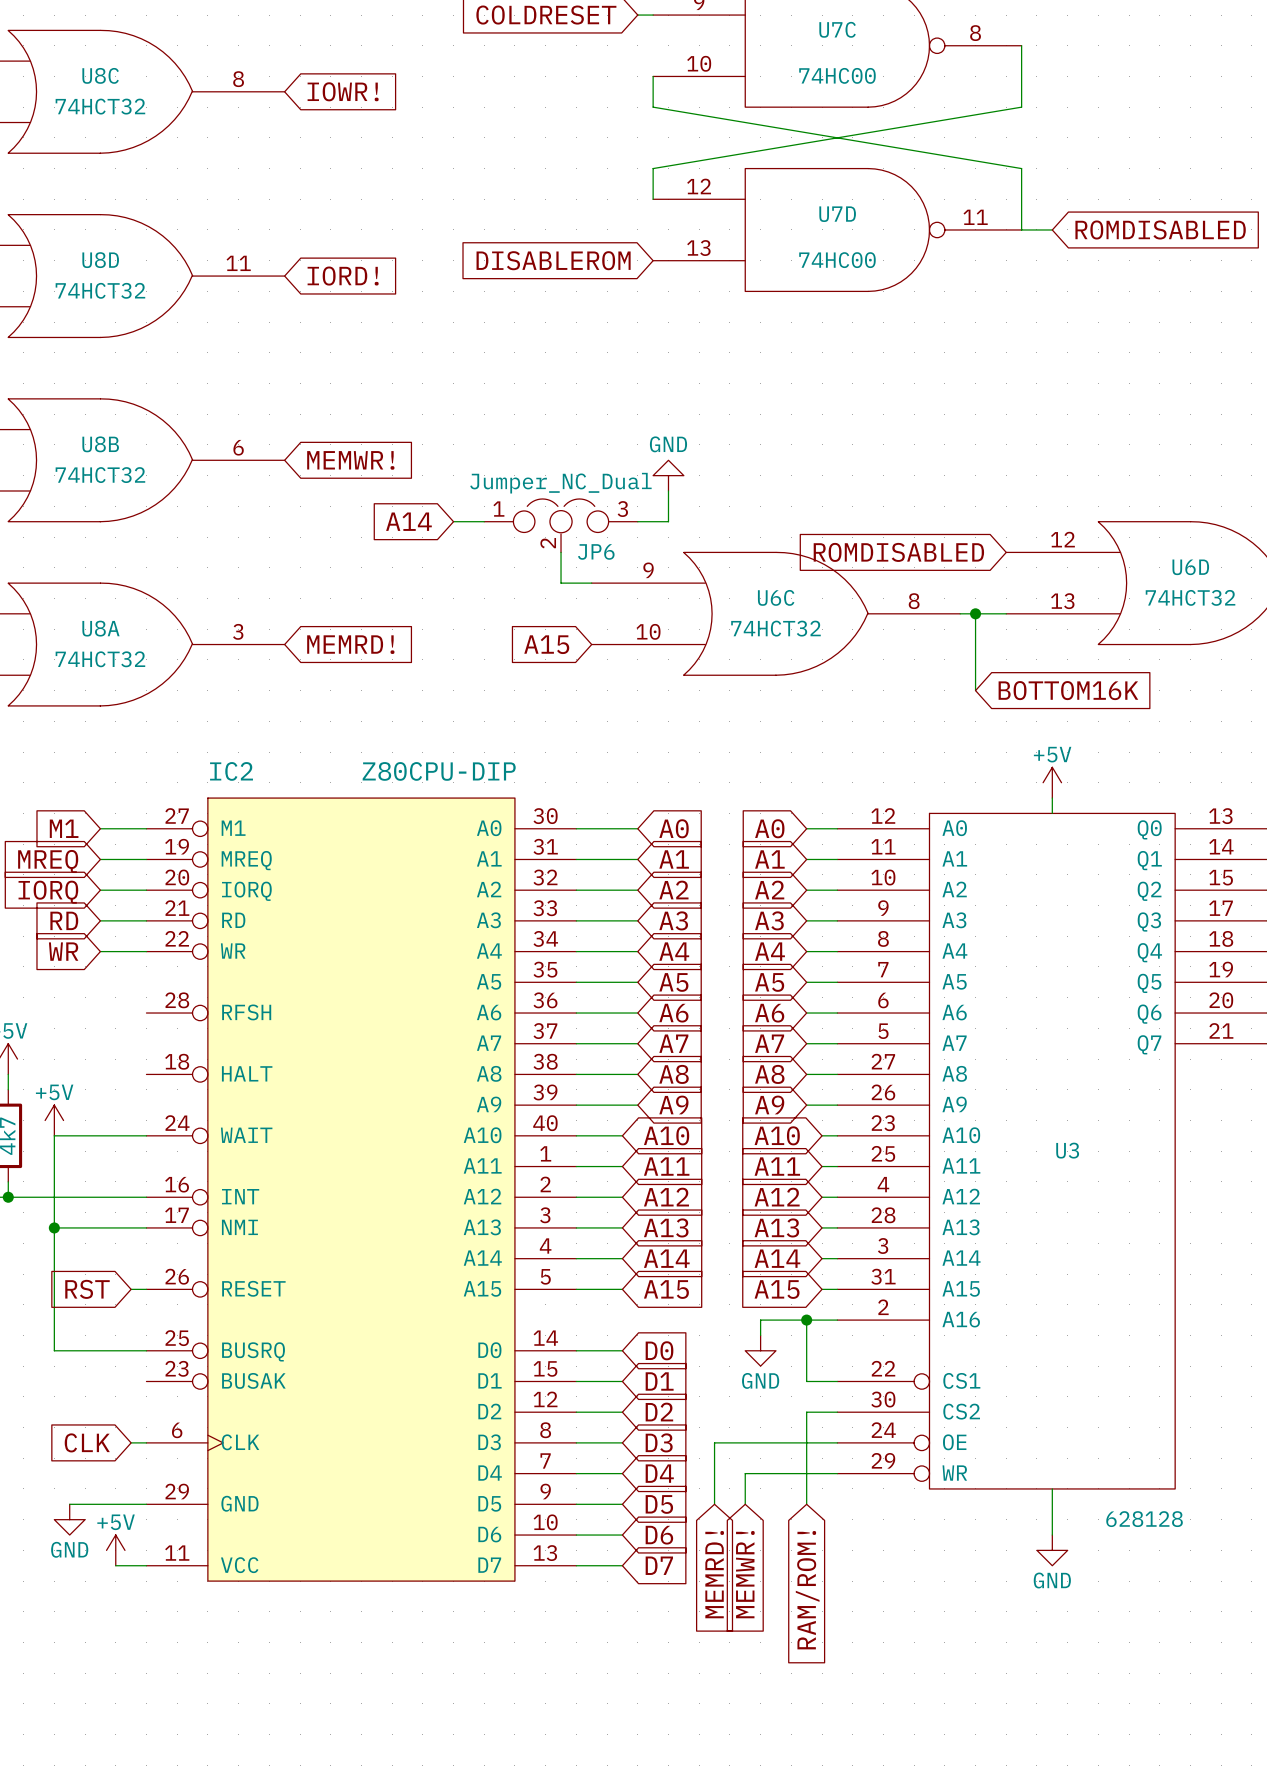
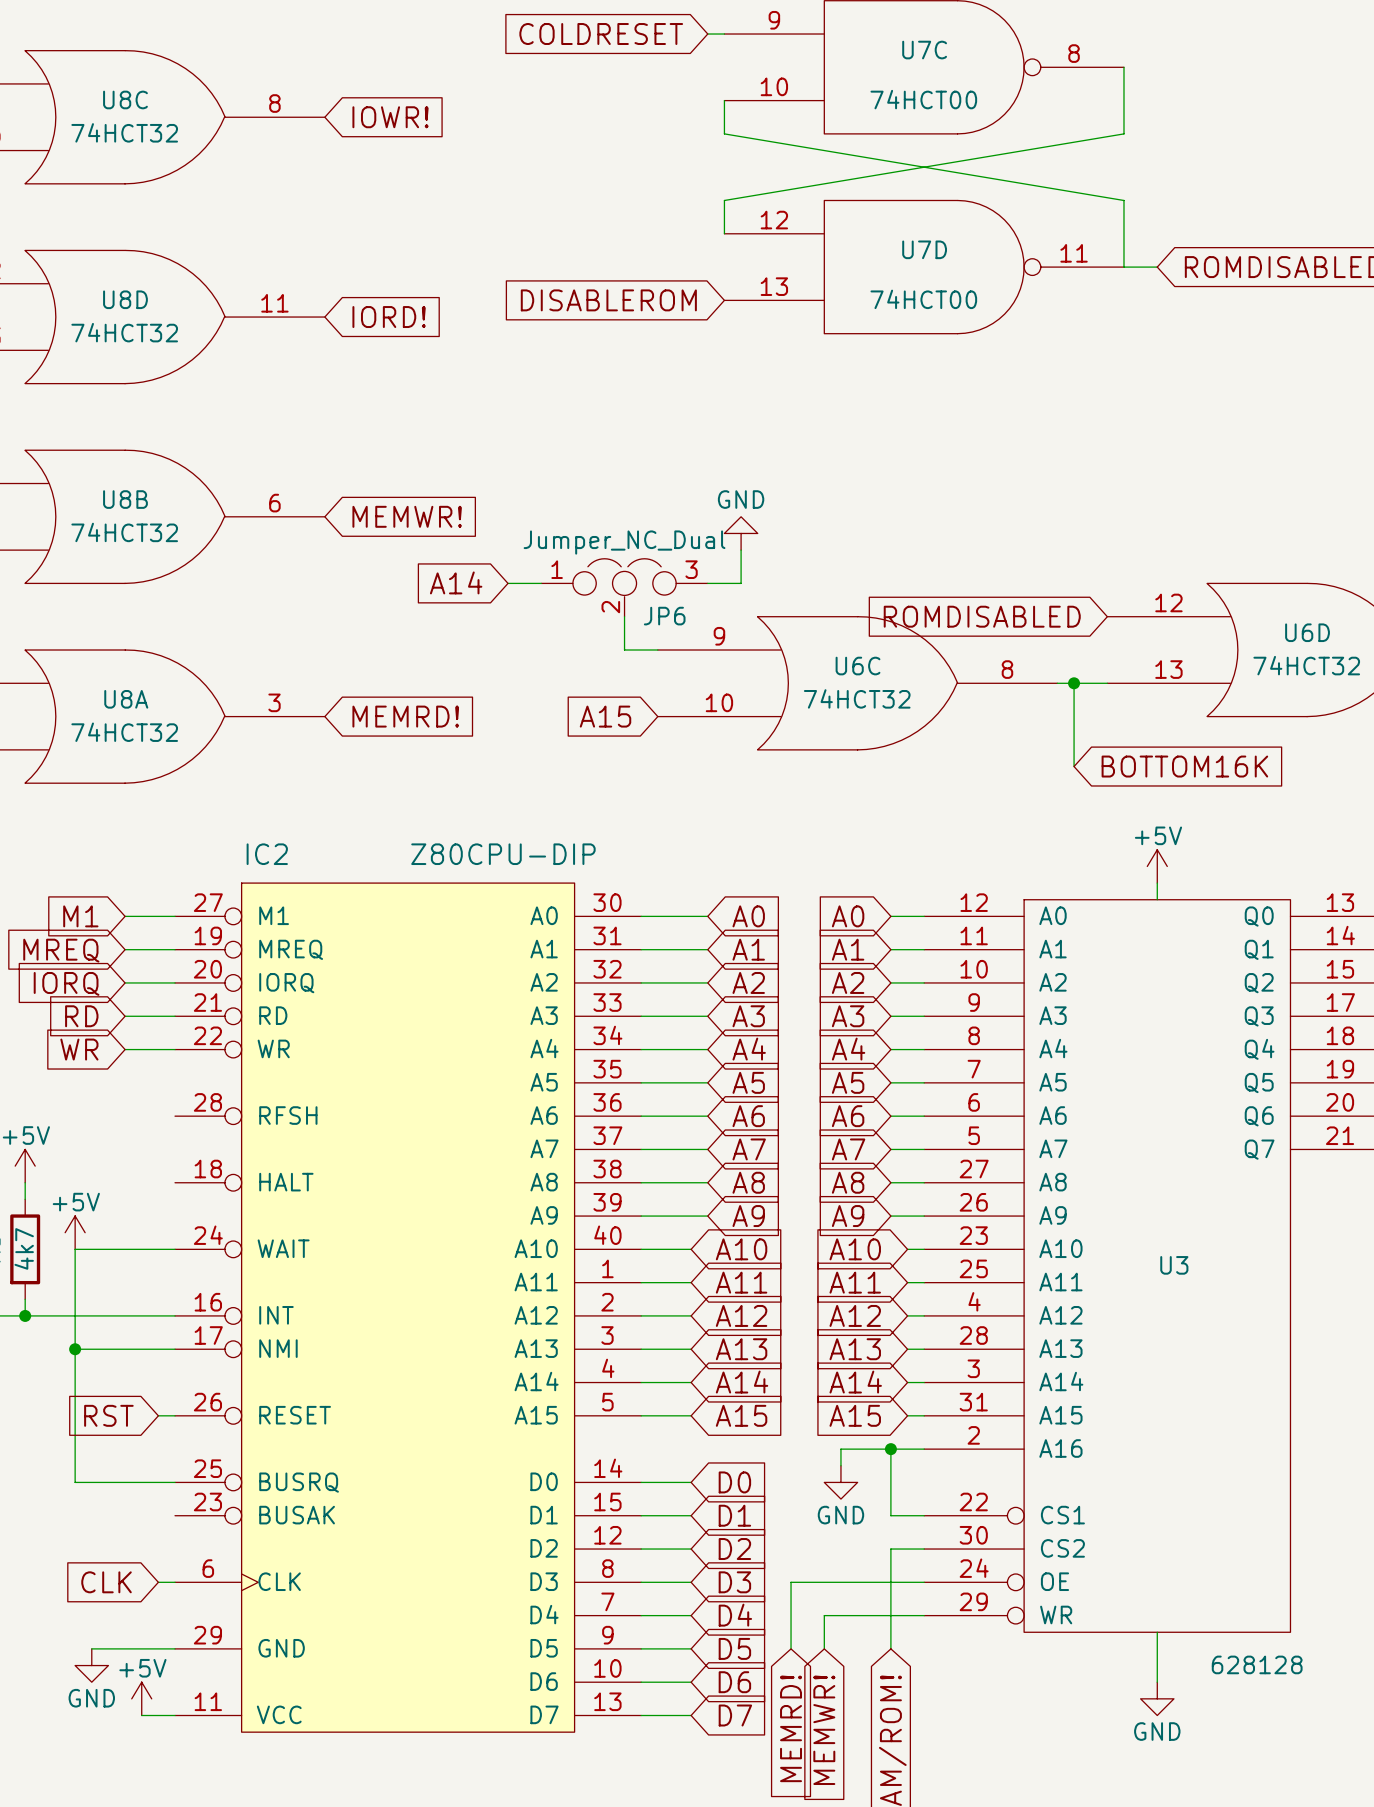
U7C value: 74HC00 (837, 75) -> 74HCT00 (923, 99)
U7D value: 74HC00 (837, 260) -> 74HCT00 (923, 299)

